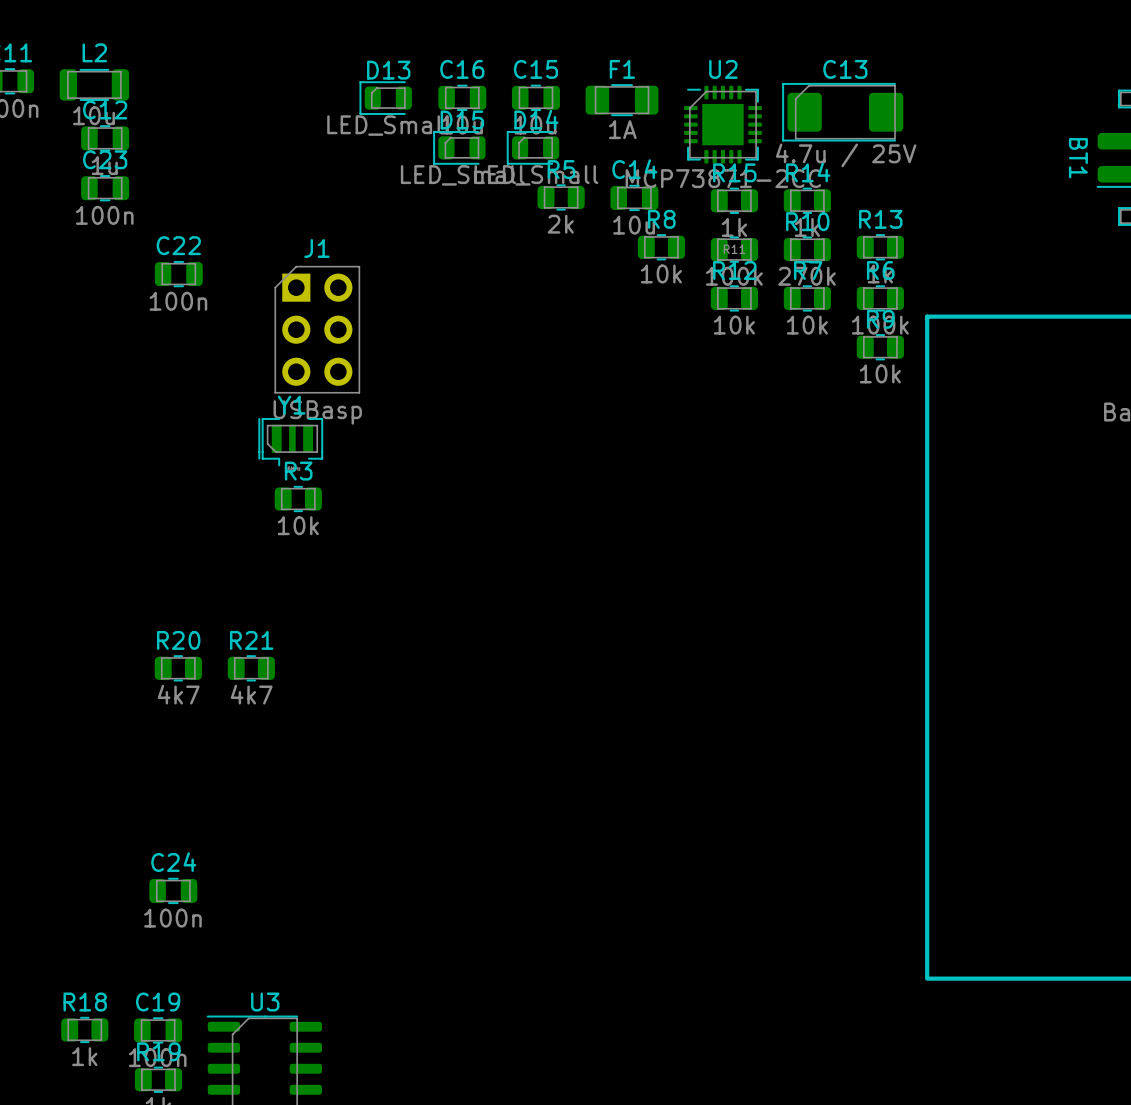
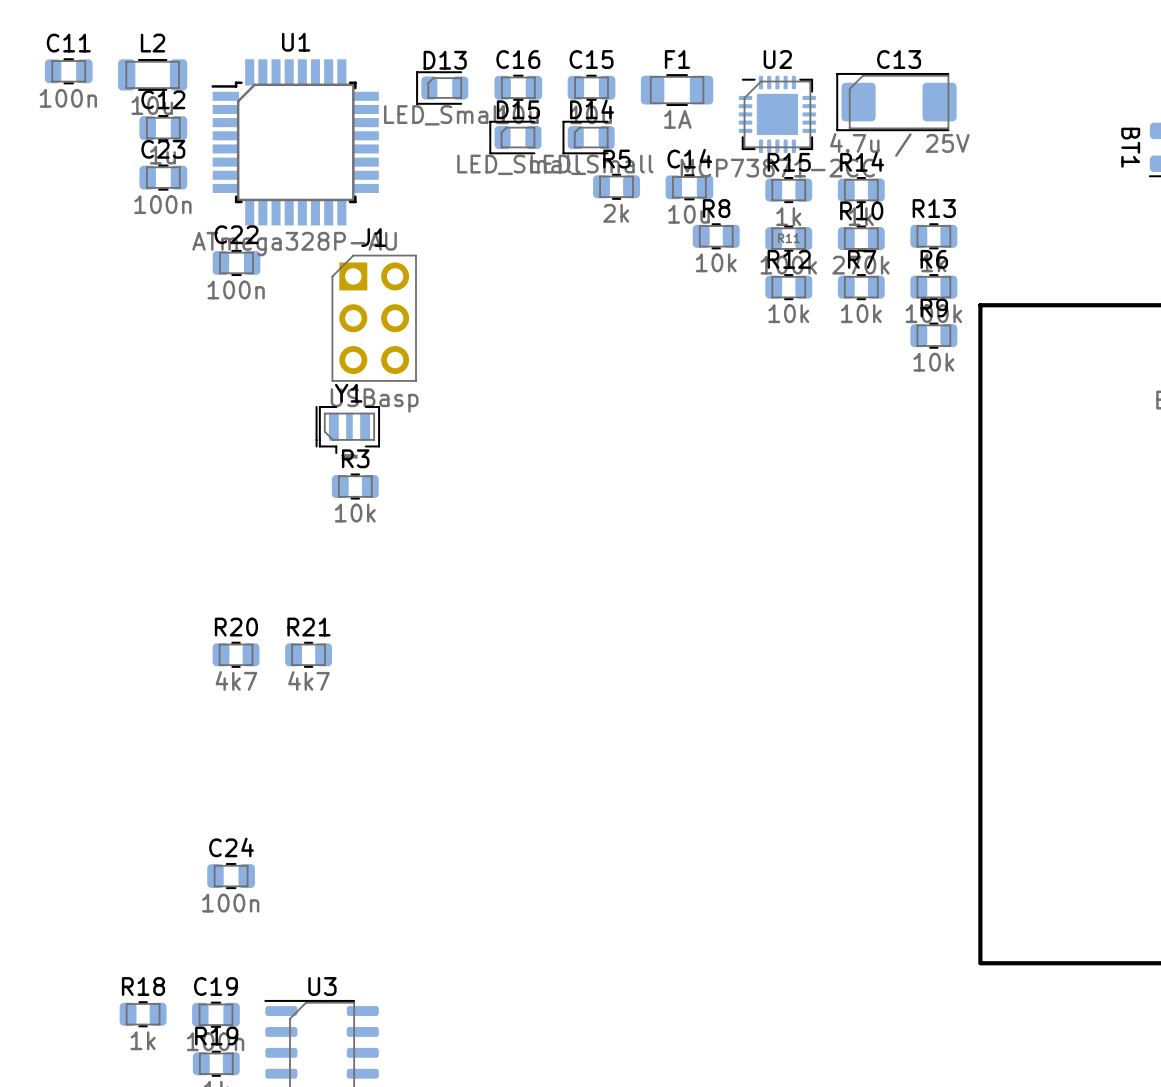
U1: none -> ATmega328P-AU (295, 142)

